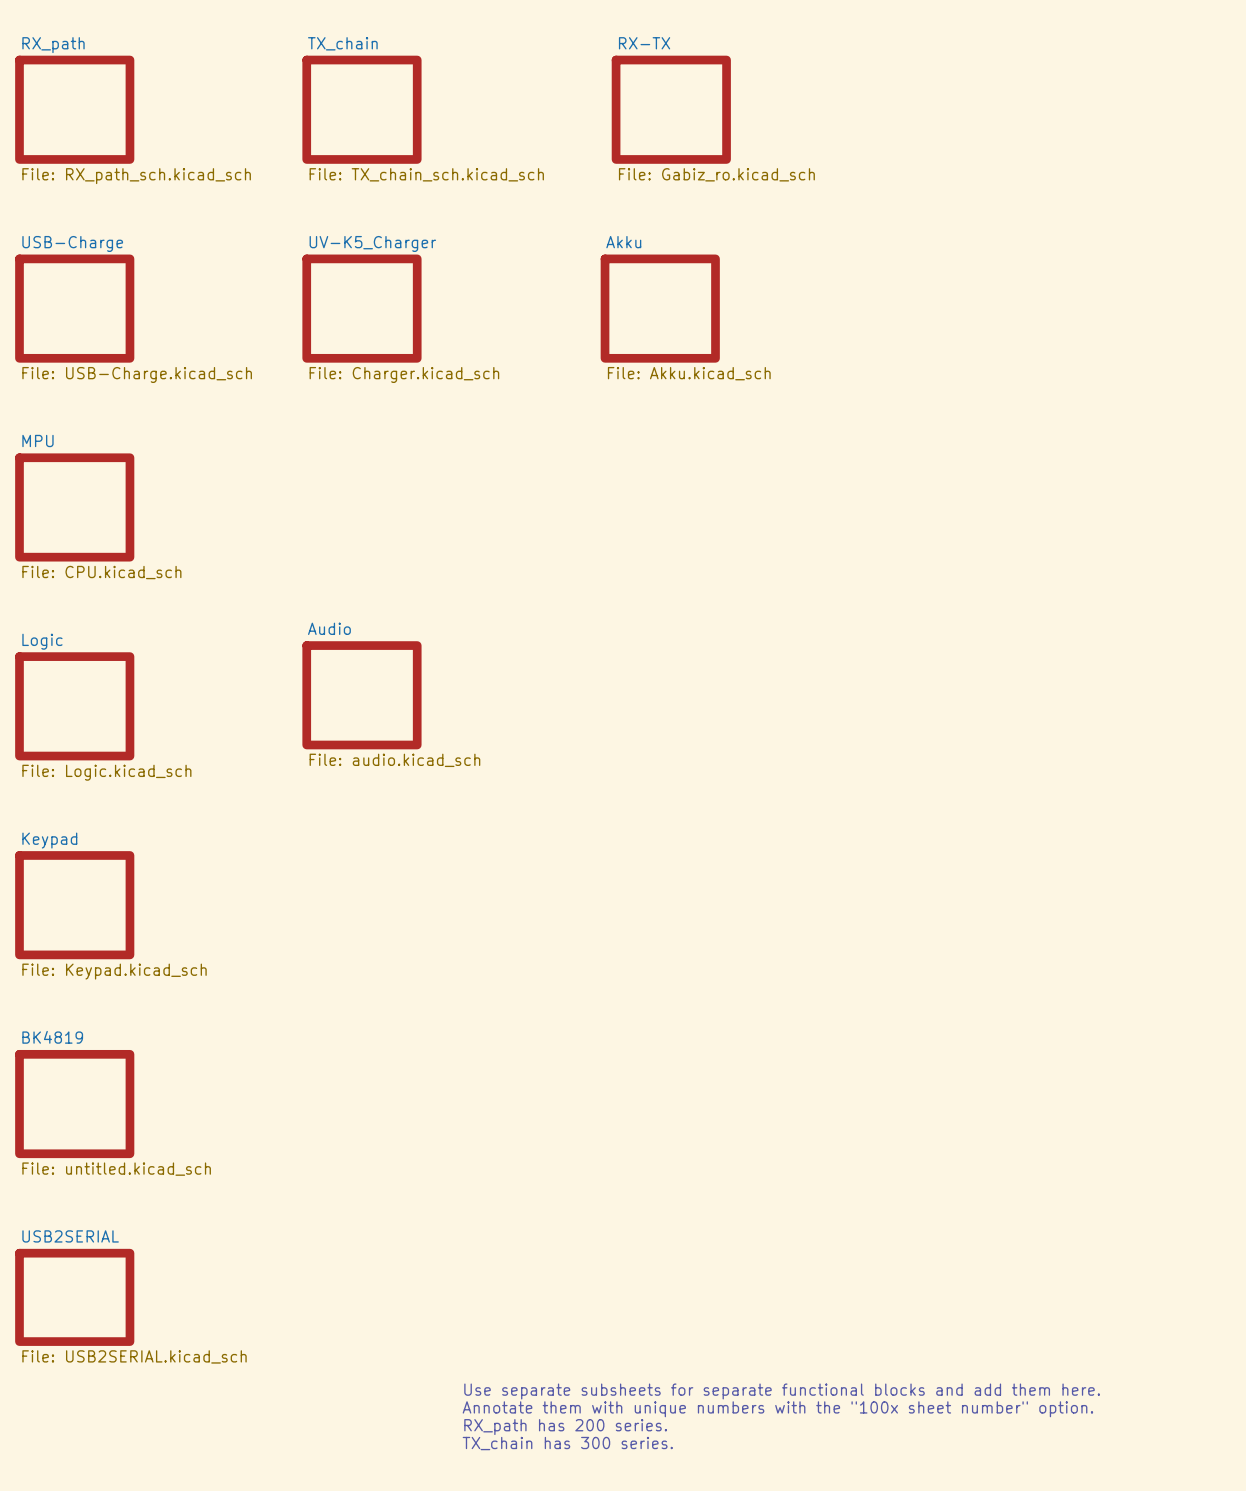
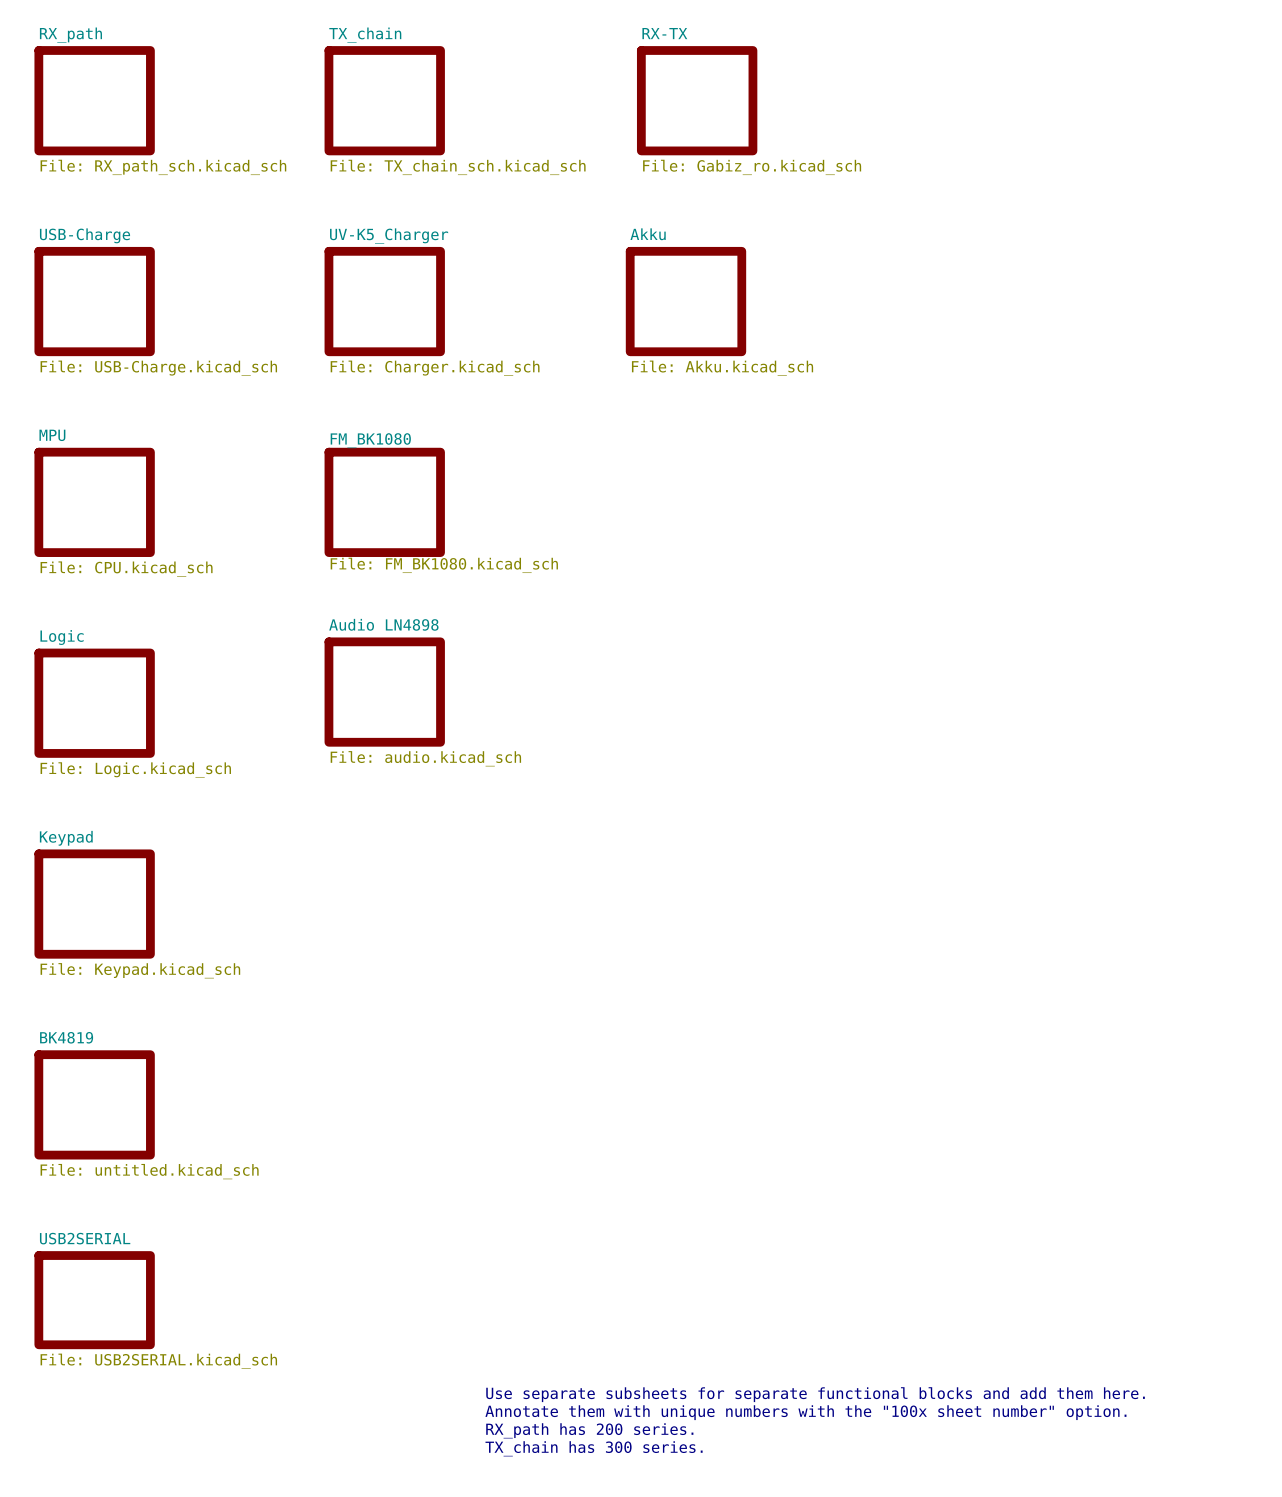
sheet FM_BK1080: none -> File: FM_BK1080.kicad_sch (384, 502)
sheet Audio name: Audio (329, 628) -> Audio LN4898 (383, 624)

